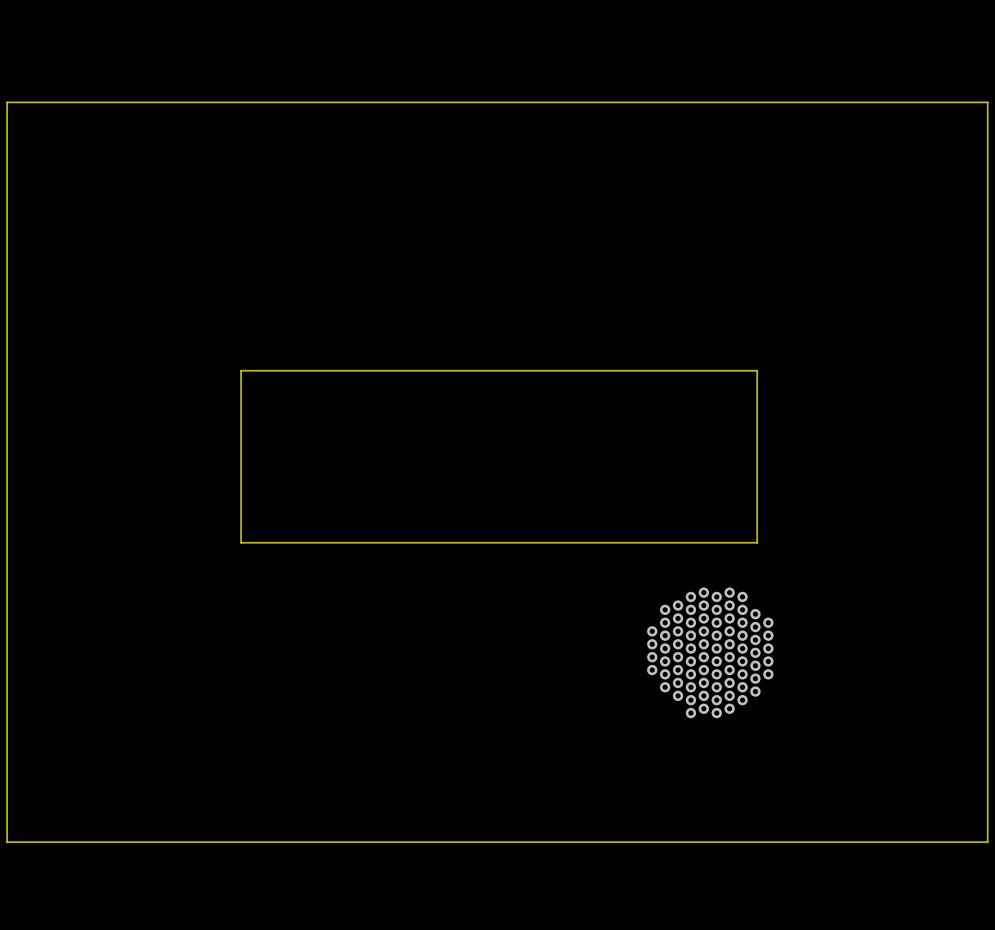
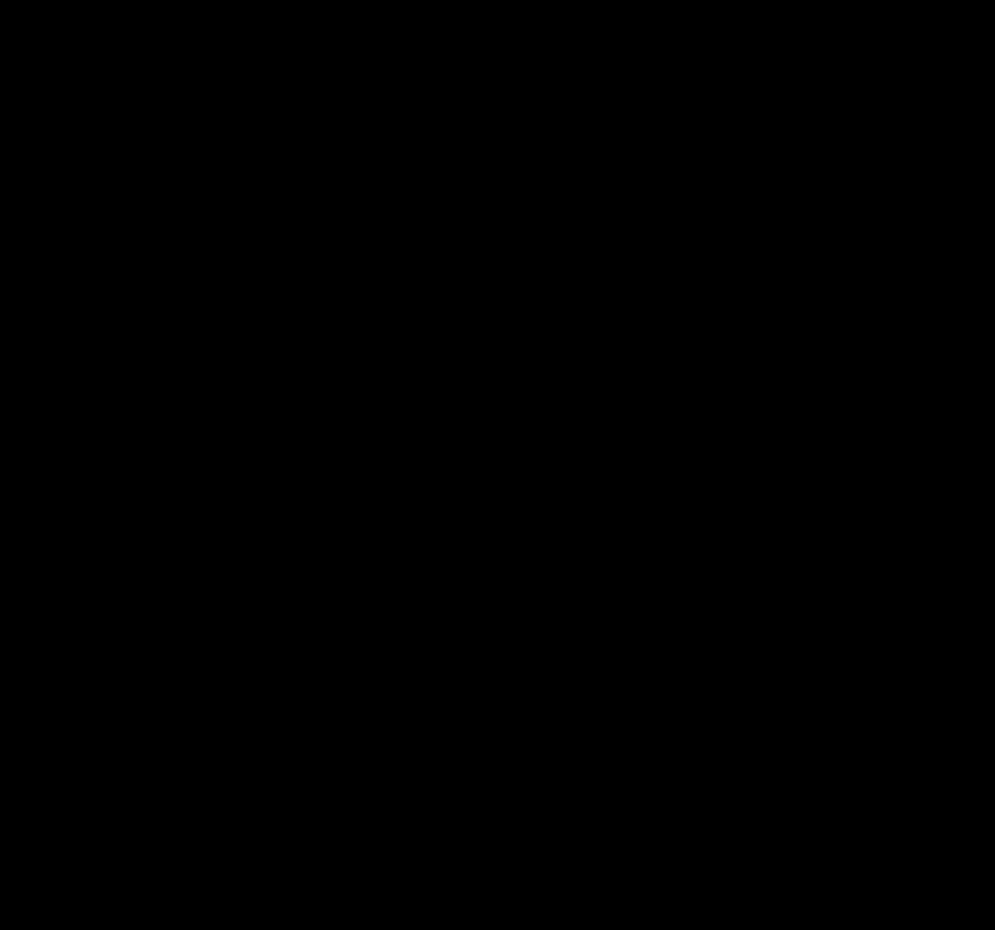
board edge: (7, 102) (987, 102) (987, 842) (7, 842) (7, 102) -> none
board edge: (241, 370) (757, 370) (757, 542) (241, 542) (241, 370) -> none
via: (703, 592) -> none
via: (729, 592) -> none
via: (690, 596) -> none
via: (716, 596) -> none
via: (742, 596) -> none
via: (678, 605) -> none
via: (703, 605) -> none
via: (729, 605) -> none
via: (665, 609) -> none
via: (690, 609) -> none
via: (716, 609) -> none
via: (742, 609) -> none
via: (755, 614) -> none
via: (678, 618) -> none
via: (703, 618) -> none
via: (729, 618) -> none
via: (665, 622) -> none
via: (690, 622) -> none
via: (716, 622) -> none
via: (742, 622) -> none
via: (768, 622) -> none
via: (755, 627) -> none
via: (652, 631) -> none
via: (678, 631) -> none
via: (703, 631) -> none
via: (729, 631) -> none
via: (665, 635) -> none
via: (690, 635) -> none
via: (716, 635) -> none
via: (742, 635) -> none
via: (768, 635) -> none
via: (755, 639) -> none
via: (652, 644) -> none
via: (678, 644) -> none
via: (703, 644) -> none
via: (729, 644) -> none
via: (665, 648) -> none
via: (690, 648) -> none
via: (716, 648) -> none
via: (742, 648) -> none
via: (768, 648) -> none
via: (755, 652) -> none
via: (652, 657) -> none
via: (678, 657) -> none
via: (703, 657) -> none
via: (729, 657) -> none
via: (665, 661) -> none
via: (690, 661) -> none
via: (716, 661) -> none
via: (742, 661) -> none
via: (768, 661) -> none
via: (755, 665) -> none
via: (652, 670) -> none
via: (678, 670) -> none
via: (703, 670) -> none
via: (729, 670) -> none
via: (665, 674) -> none
via: (690, 674) -> none
via: (716, 674) -> none
via: (742, 674) -> none
via: (768, 674) -> none
via: (755, 678) -> none
via: (678, 682) -> none
via: (703, 682) -> none
via: (729, 682) -> none
via: (665, 687) -> none
via: (690, 687) -> none
via: (716, 687) -> none
via: (742, 687) -> none
via: (755, 691) -> none
via: (678, 695) -> none
via: (703, 695) -> none
via: (729, 695) -> none
via: (690, 700) -> none
via: (716, 700) -> none
via: (742, 700) -> none
via: (703, 708) -> none
via: (729, 708) -> none
via: (690, 713) -> none
via: (716, 713) -> none

